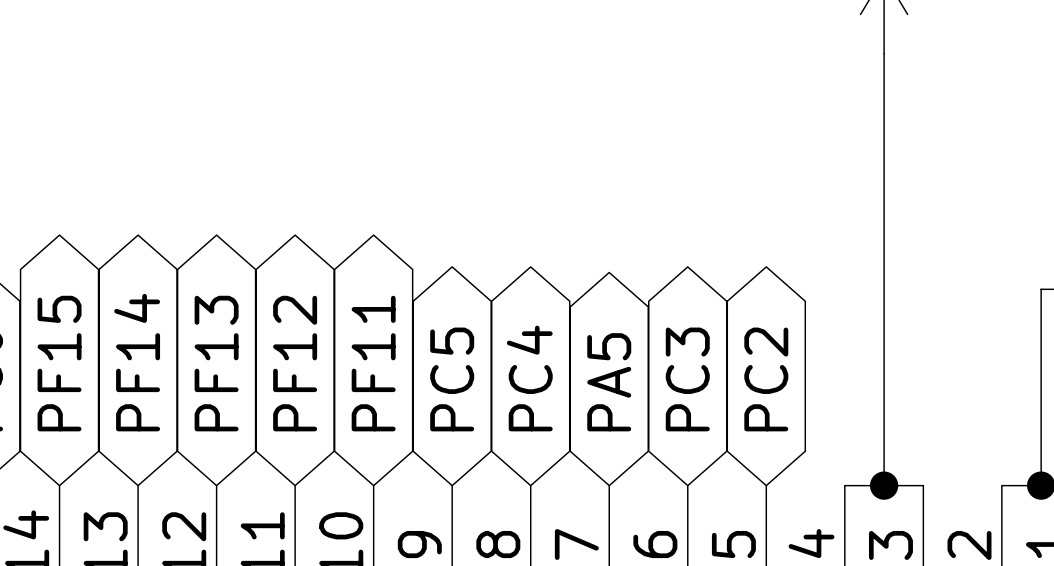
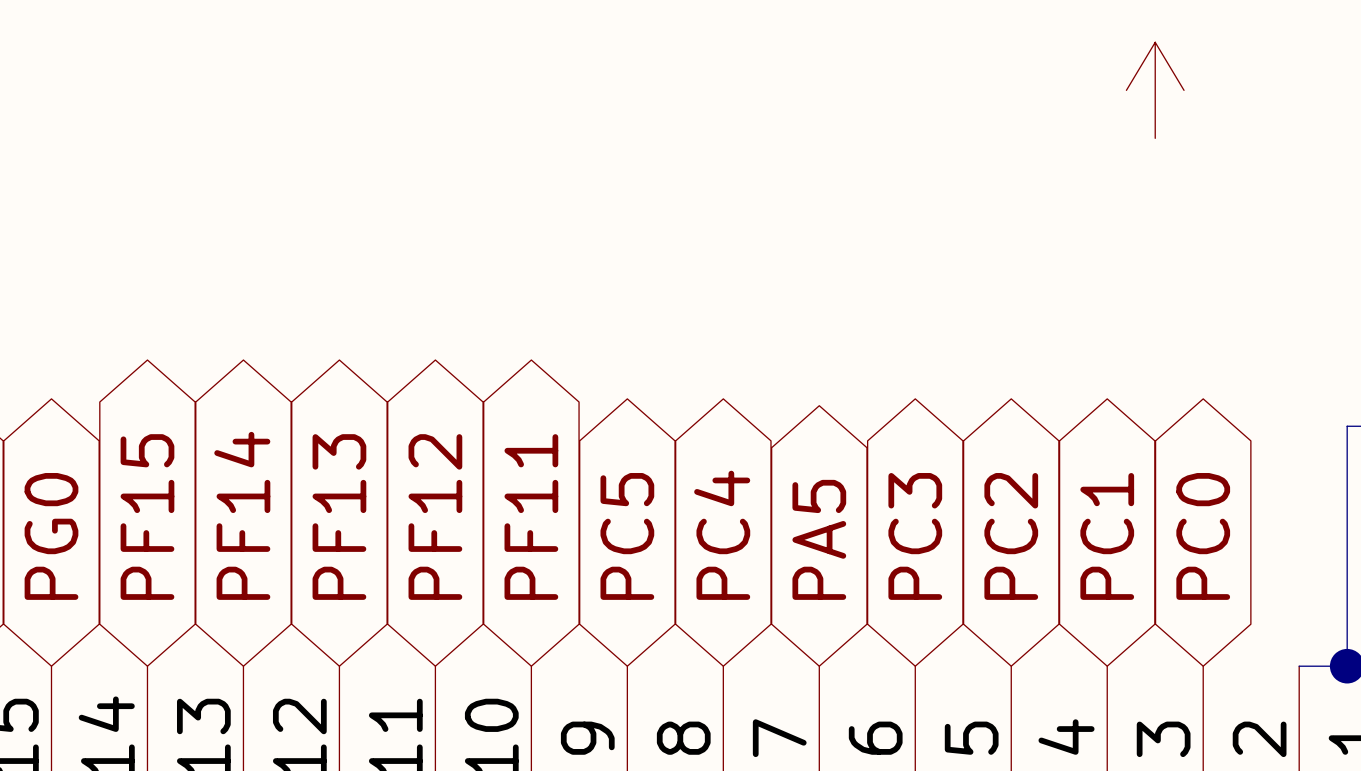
wire: (884, 53) (884, 485) -> none
global label: none -> PC1 (1107, 536)
global label: none -> PC0 (1203, 536)
wire: (844, 485) (923, 485) -> none
junction: (884, 485) -> none

